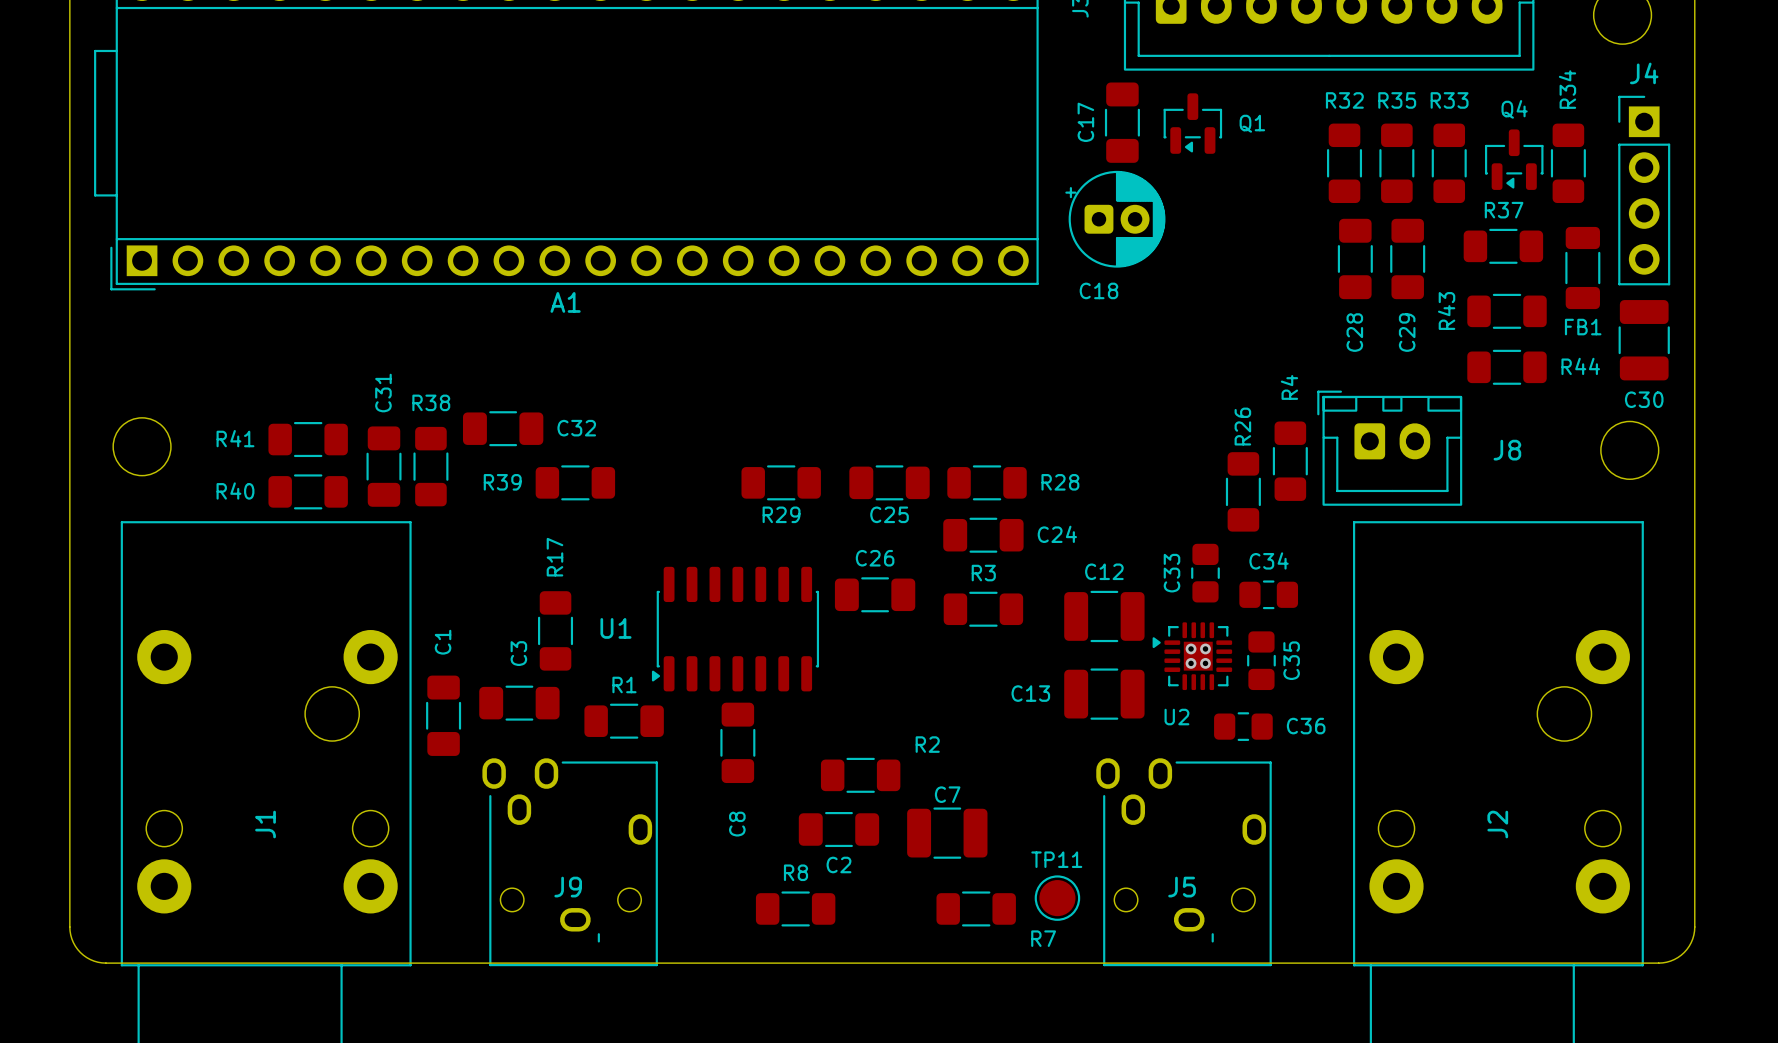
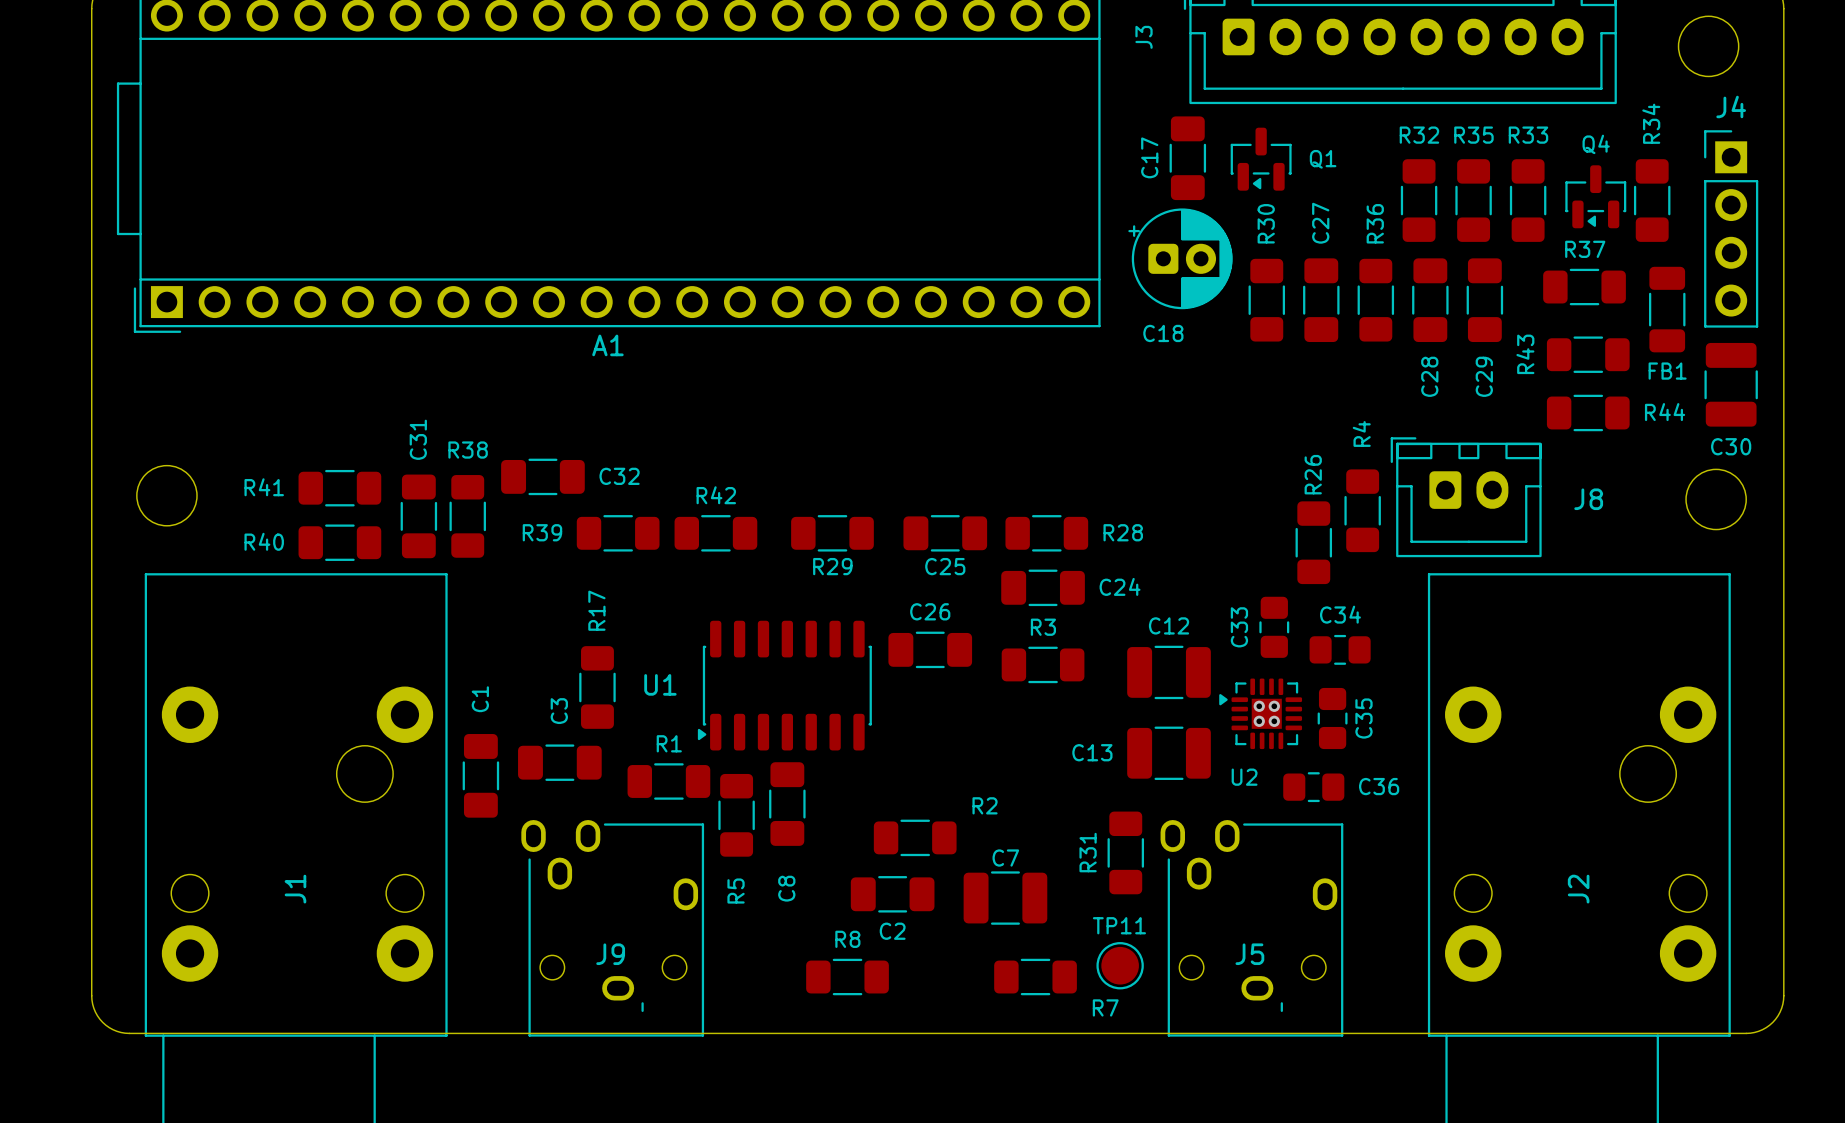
R30: none -> (1266, 300)
C27: none -> (1321, 300)
R36: none -> (1375, 300)
R42: none -> (715, 533)
R5: none -> (736, 815)
R31: none -> (1125, 852)

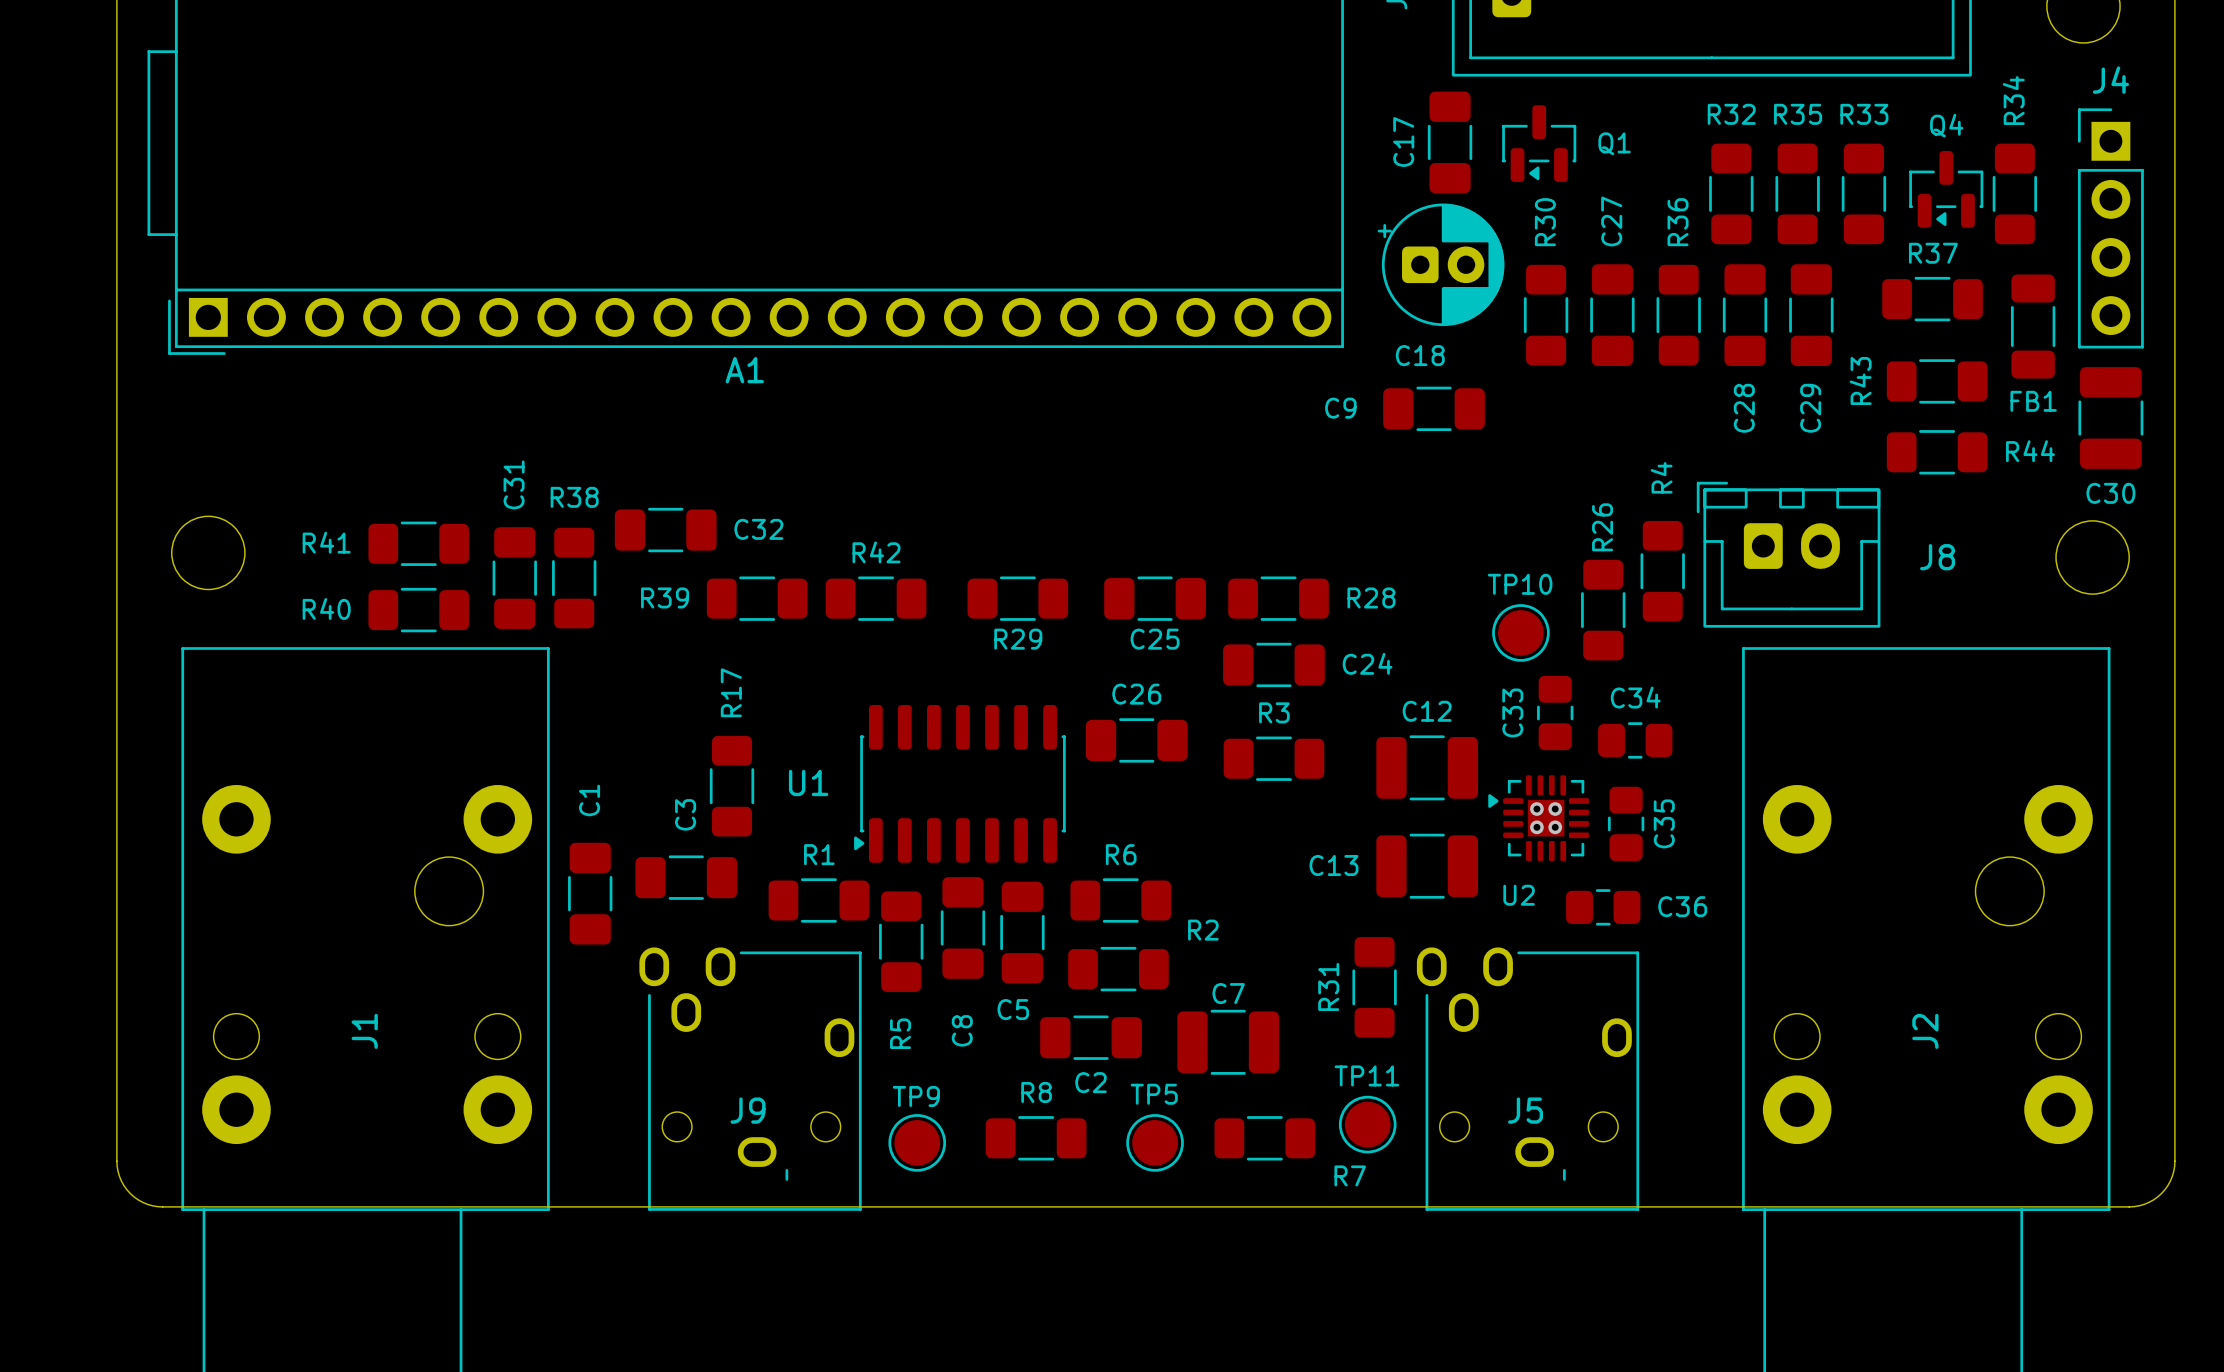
C9: none -> (1434, 408)
TP10: none -> (1520, 632)
R6: none -> (1120, 900)
C5: none -> (1022, 932)
TP9: none -> (917, 1142)
TP5: none -> (1155, 1142)

